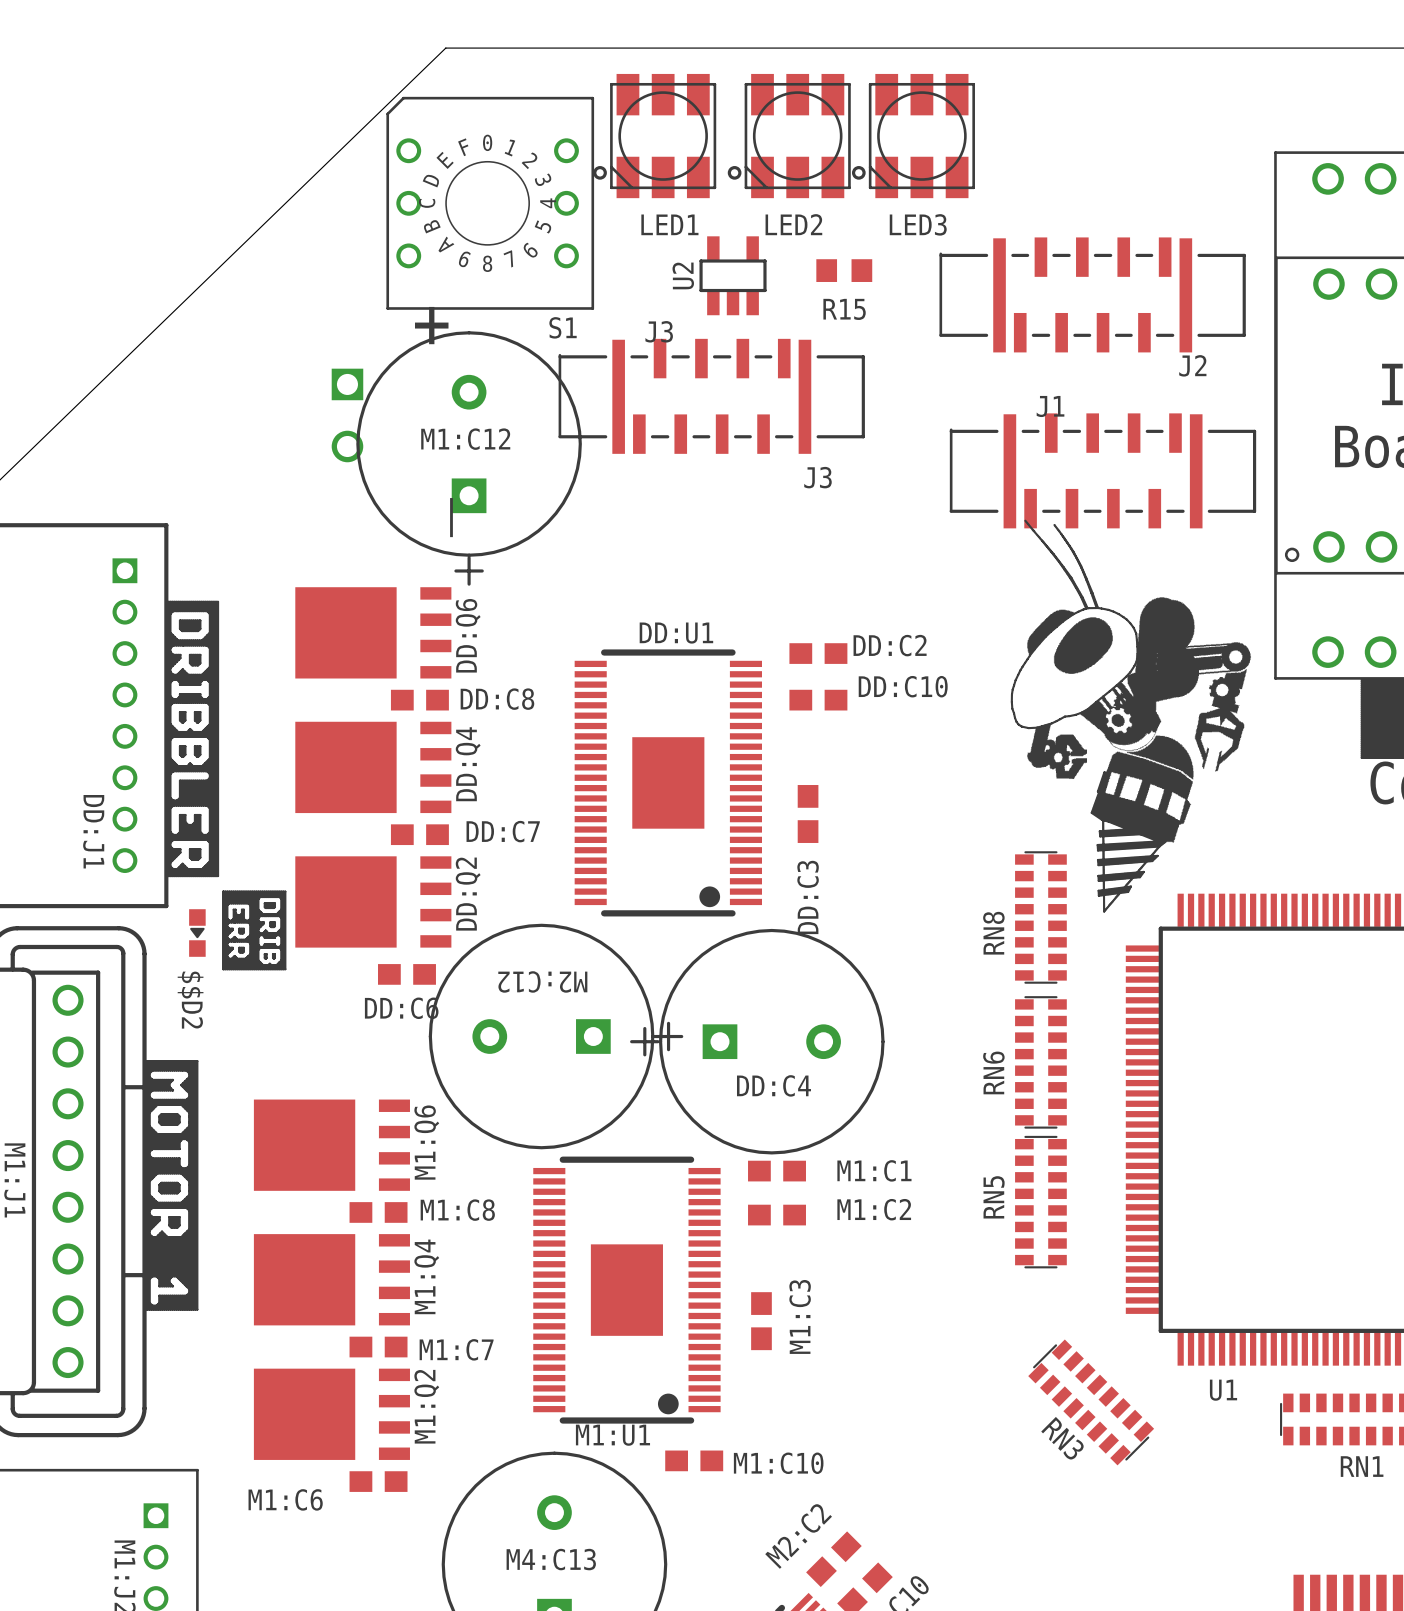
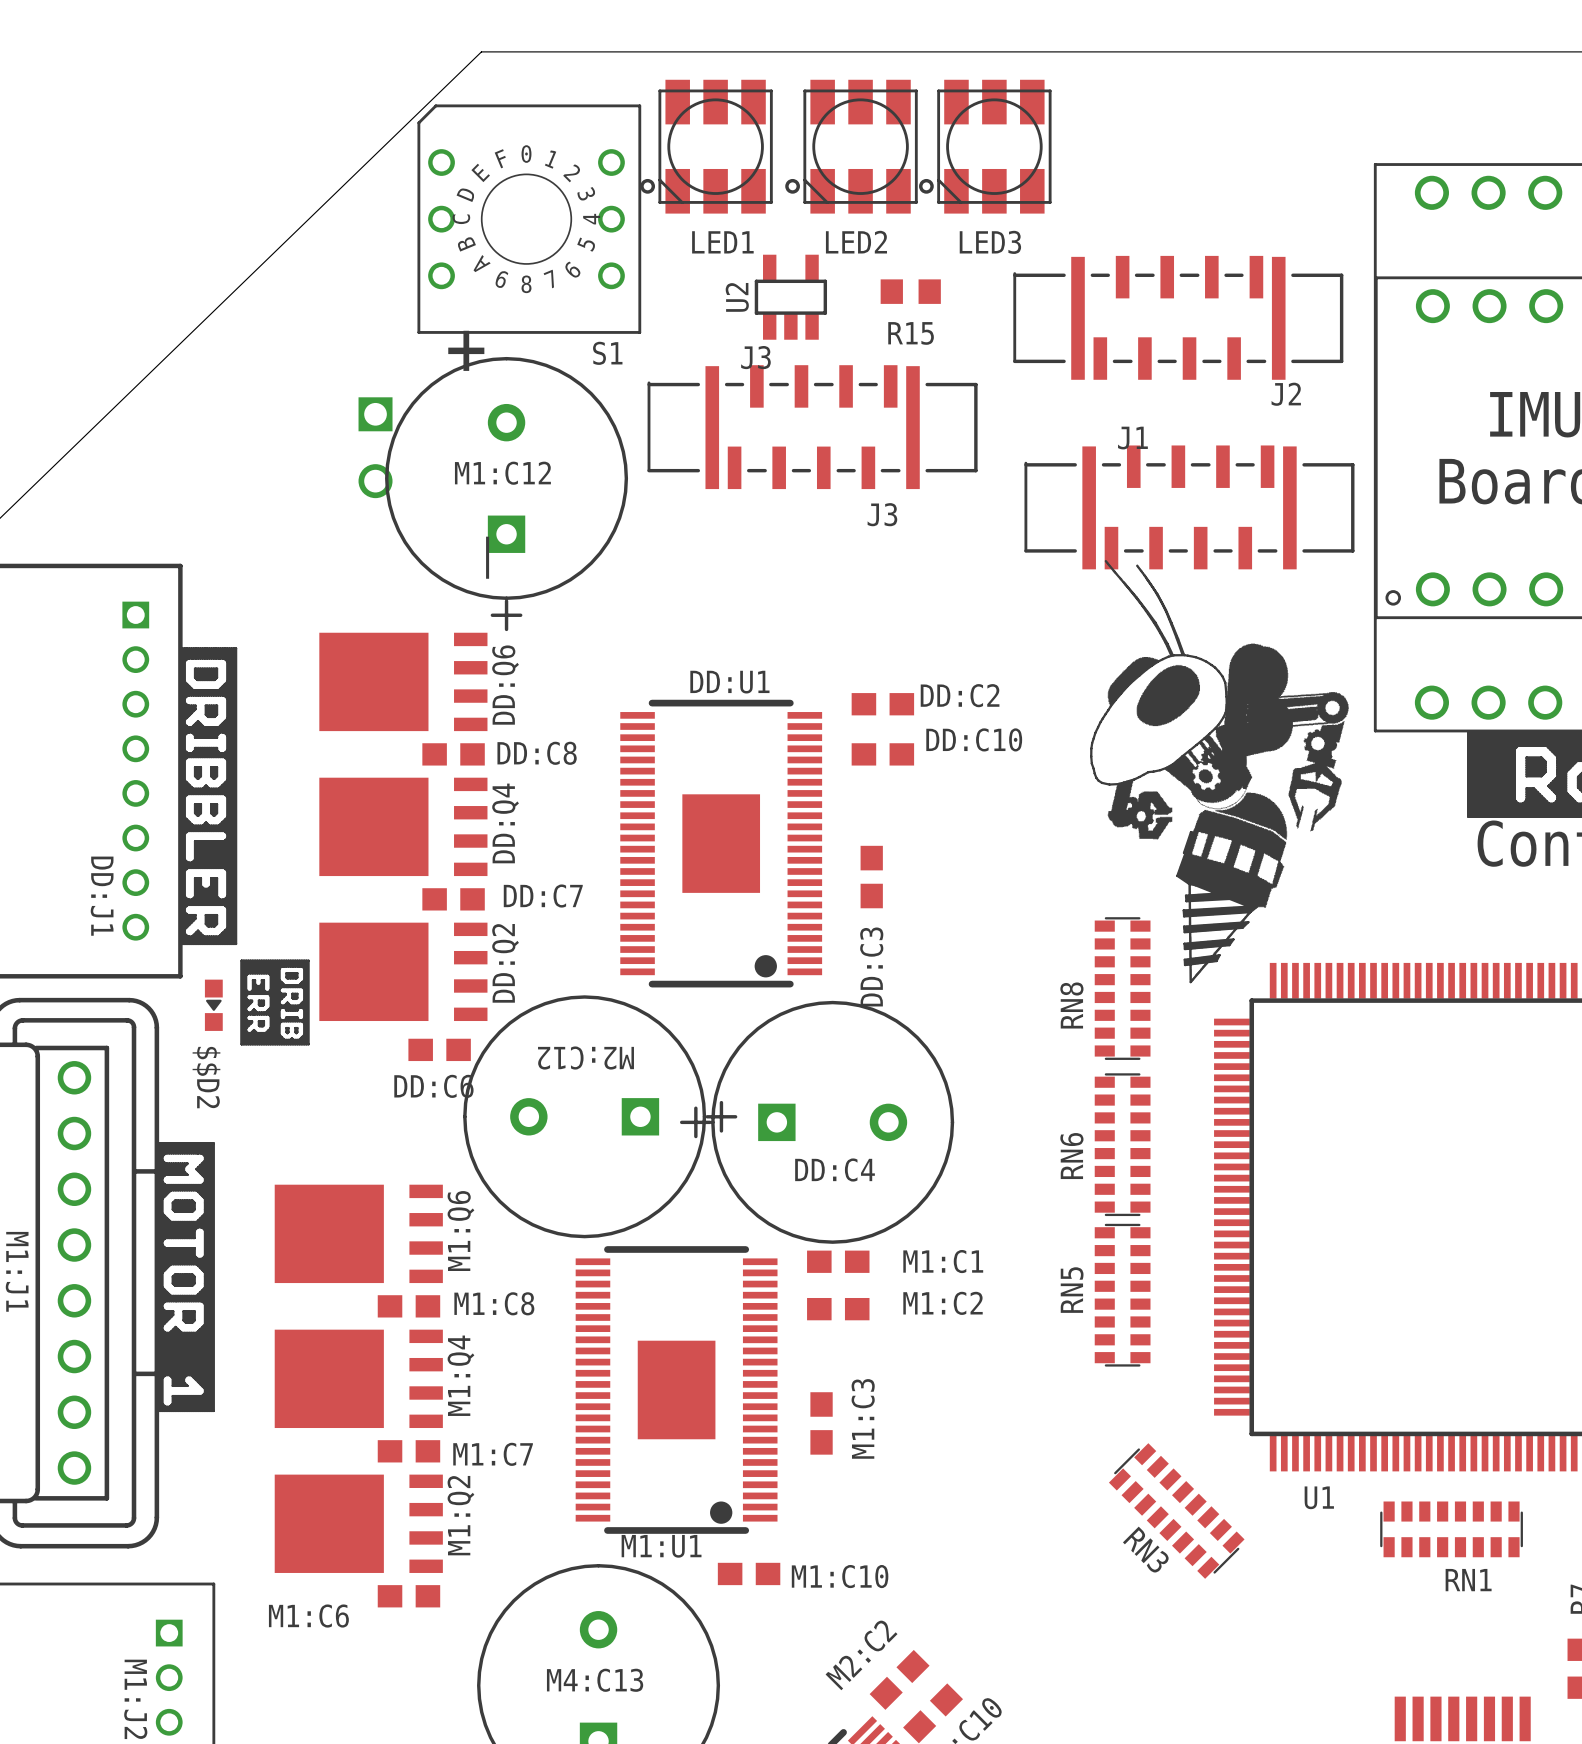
J3 position: (711, 396) -> (812, 427)

